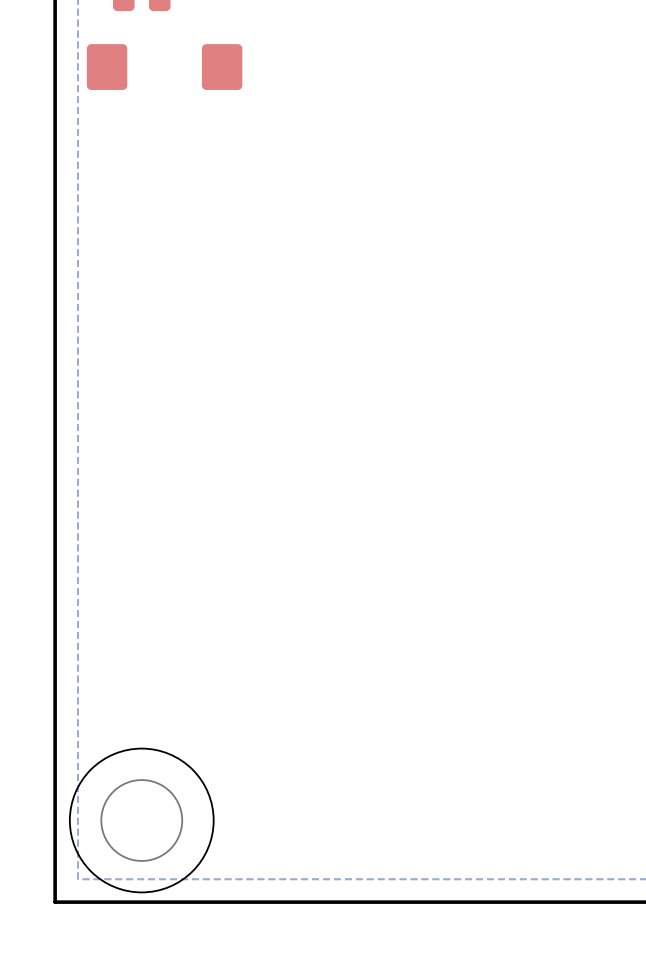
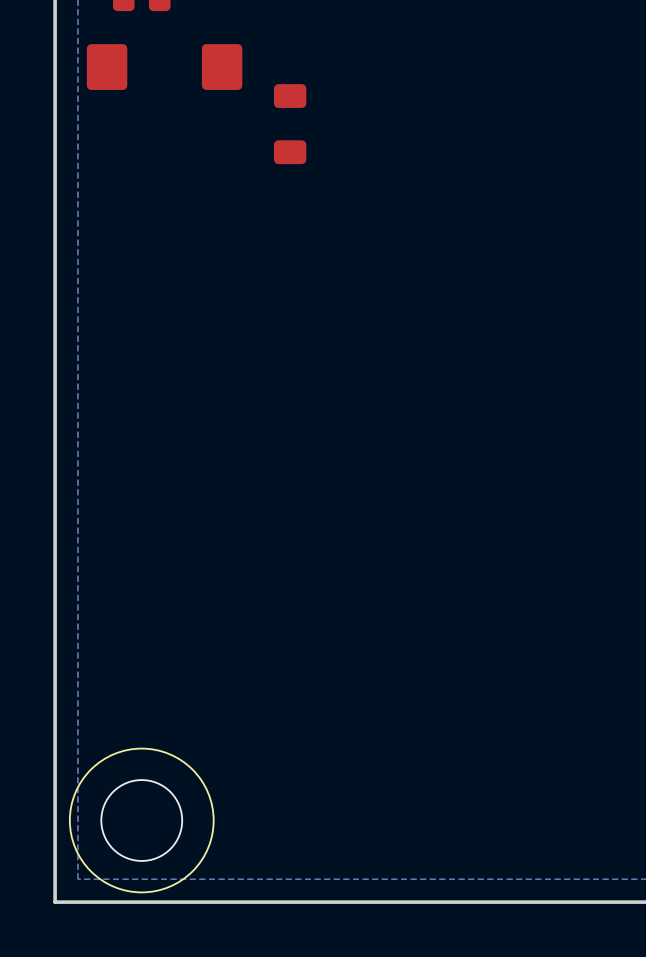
part: none -> (290, 124)

